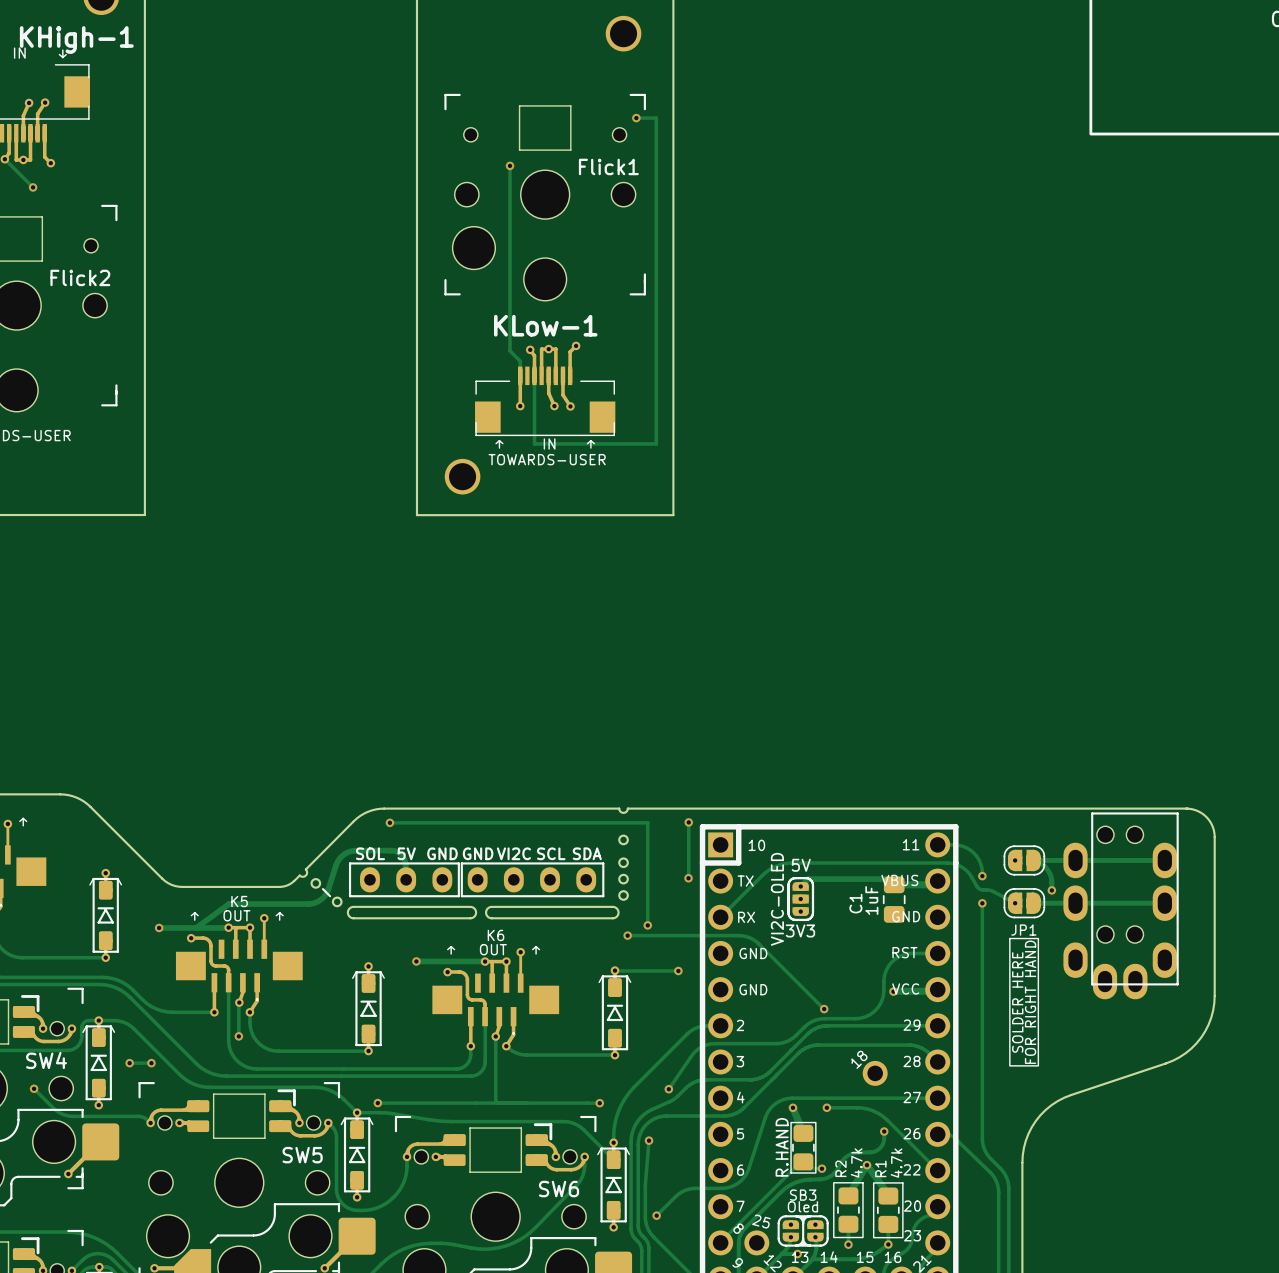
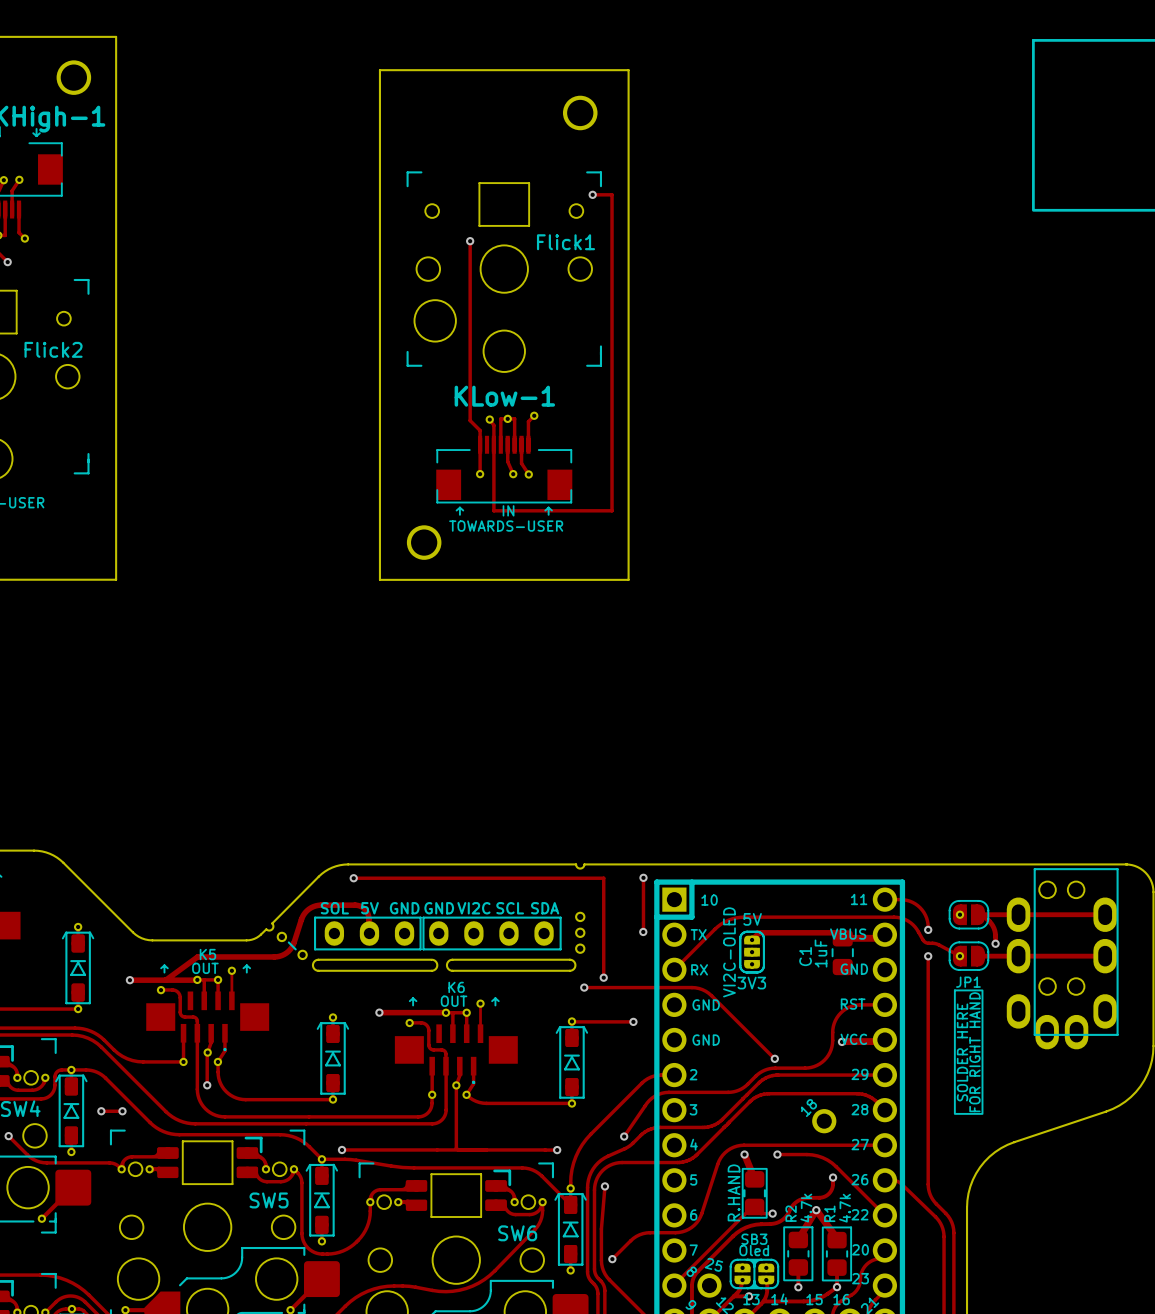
round board edge: [618, 834, 629, 846] -> none

